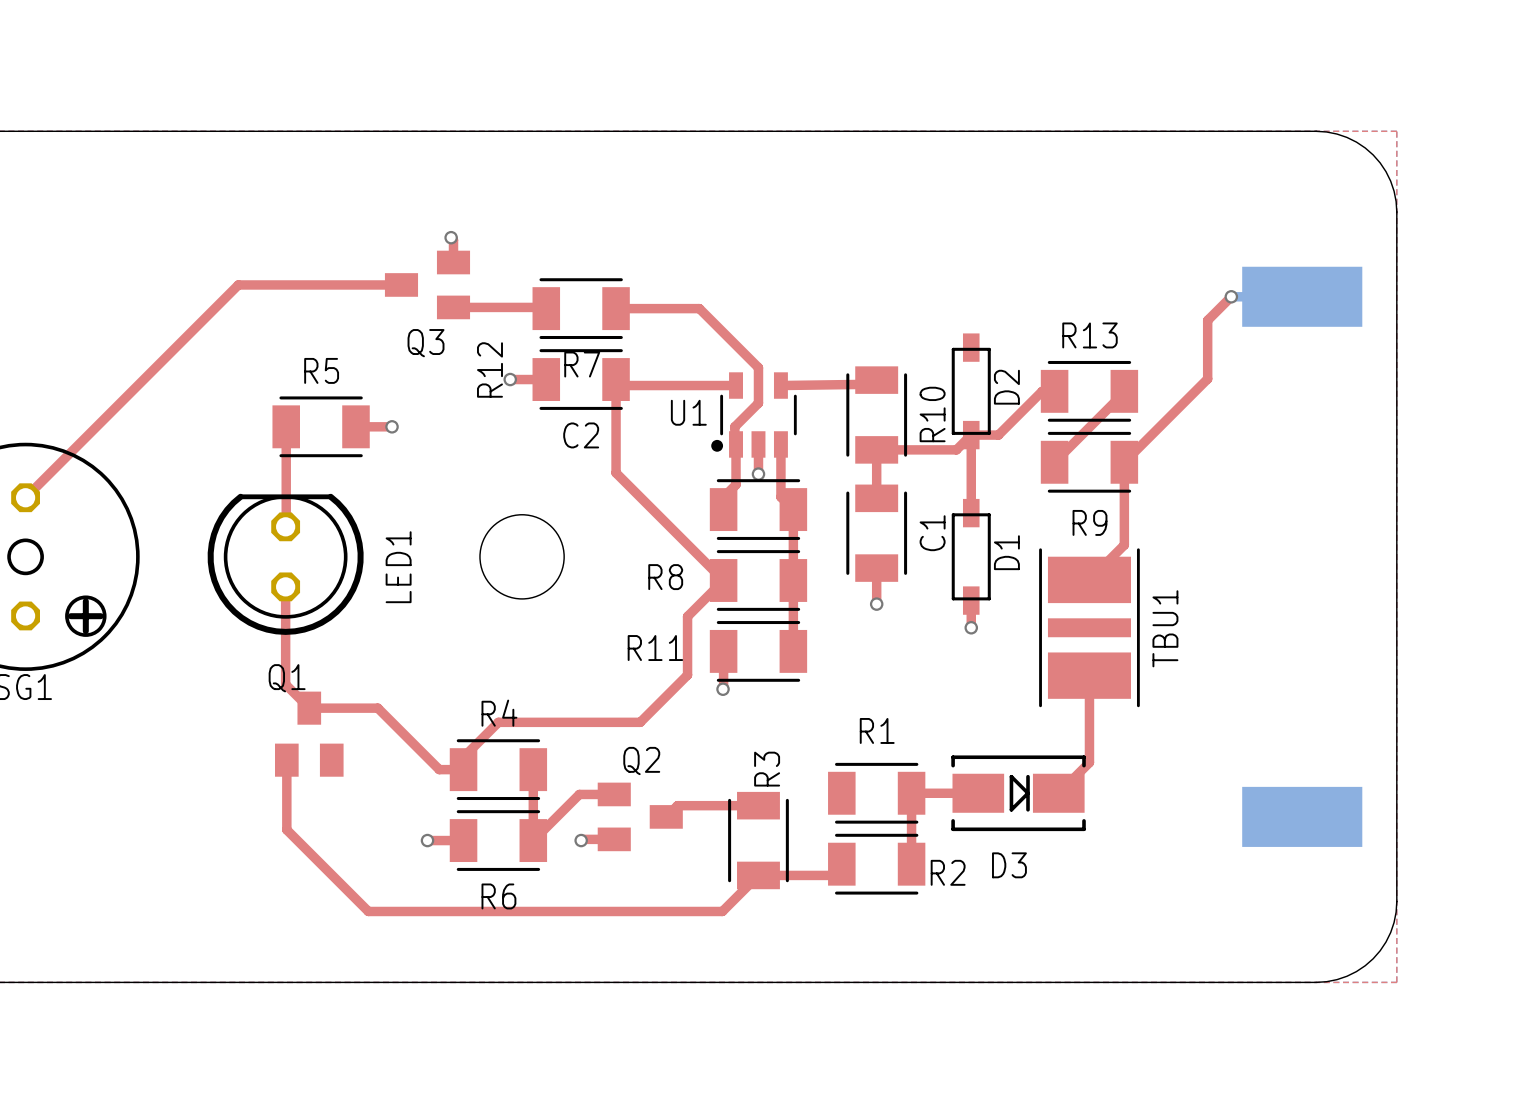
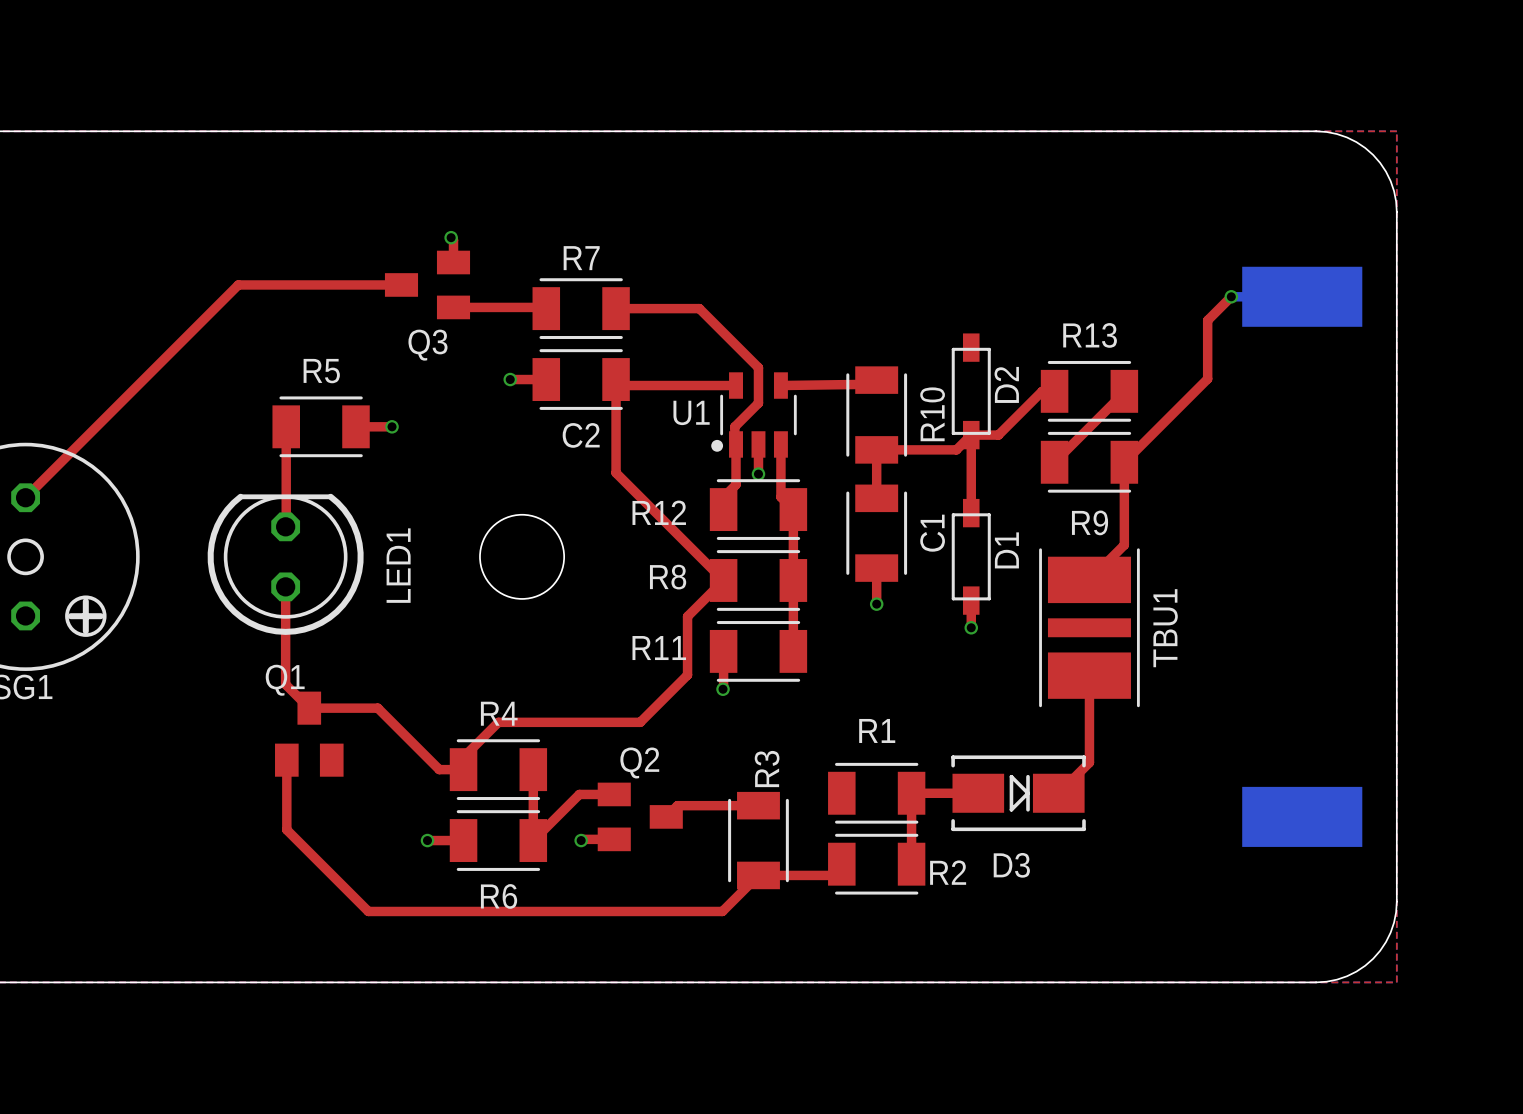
R7 name position: R7 (582, 364) -> R7 (581, 258)
R12 name rotation: 0° (489, 370) -> 90° clockwise (659, 512)
R12 name position: R12 (489, 370) -> R12 (659, 512)

